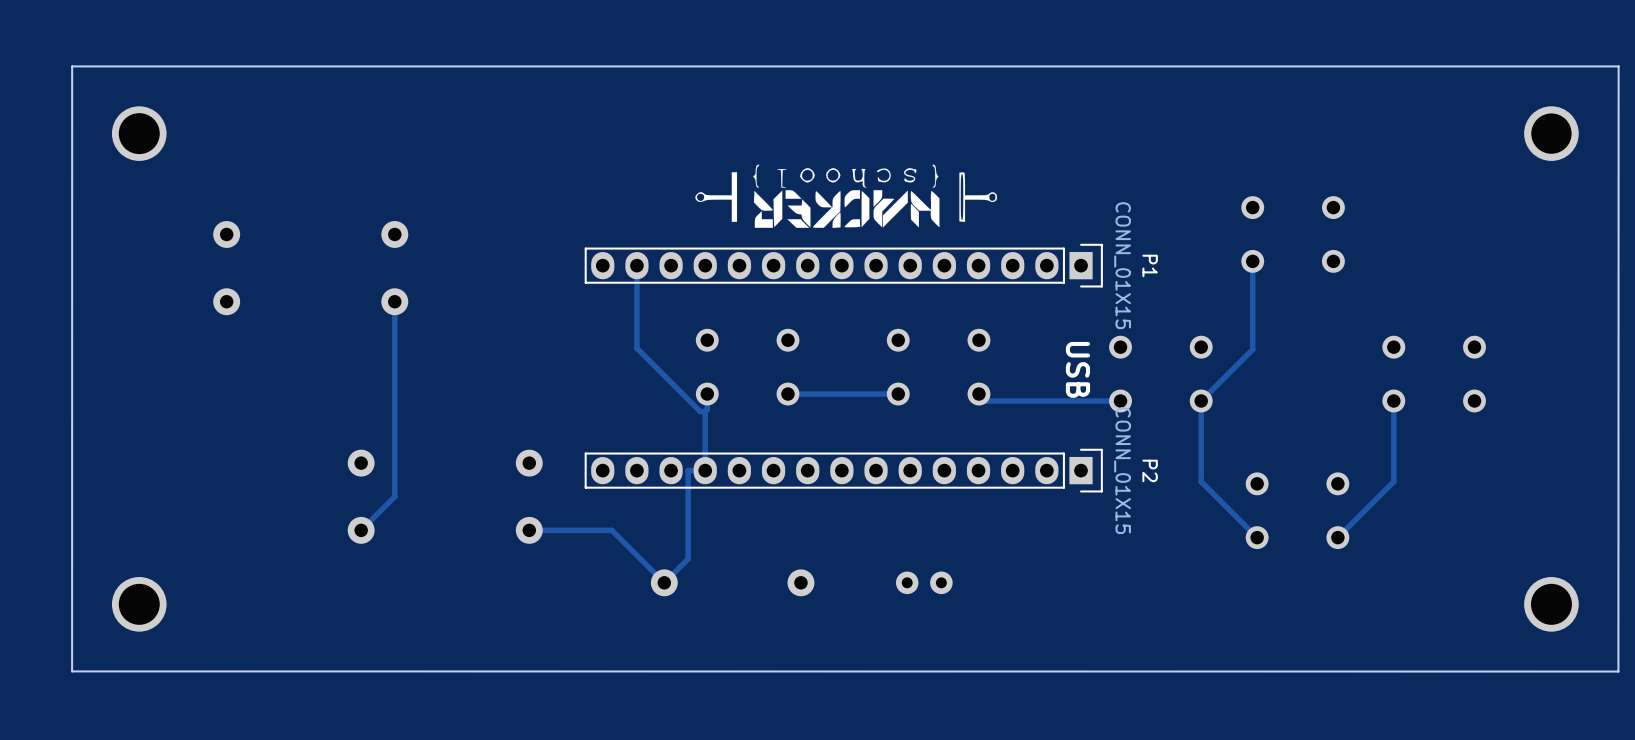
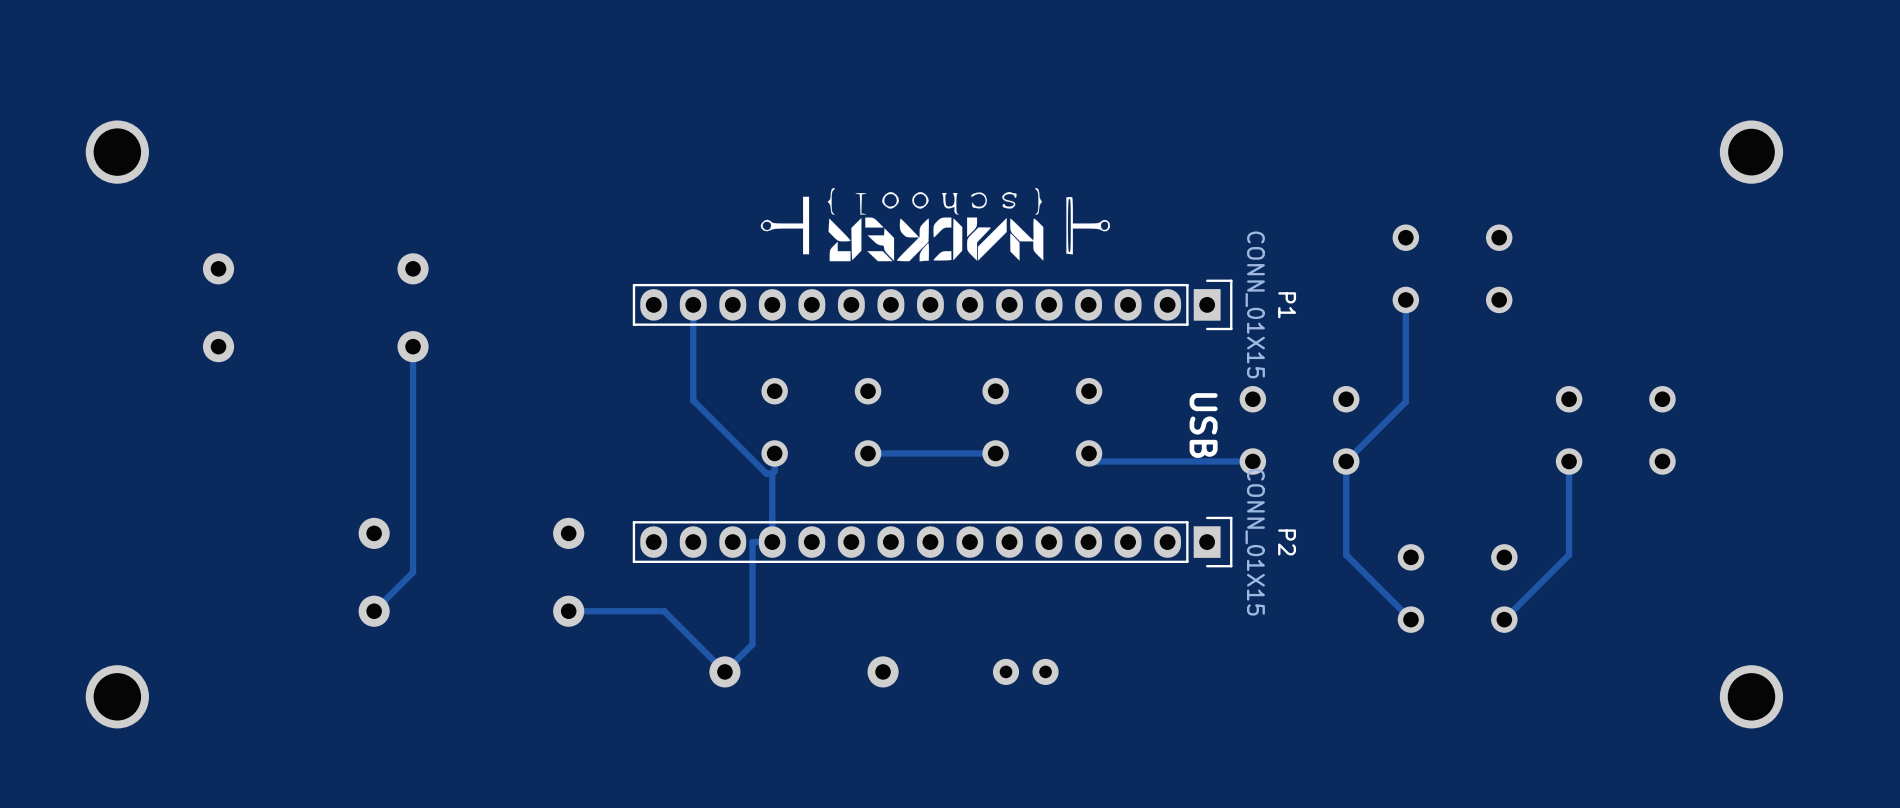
board edge: (1618, 66) (1618, 671) (72, 671) (72, 66) (1618, 66) -> none

